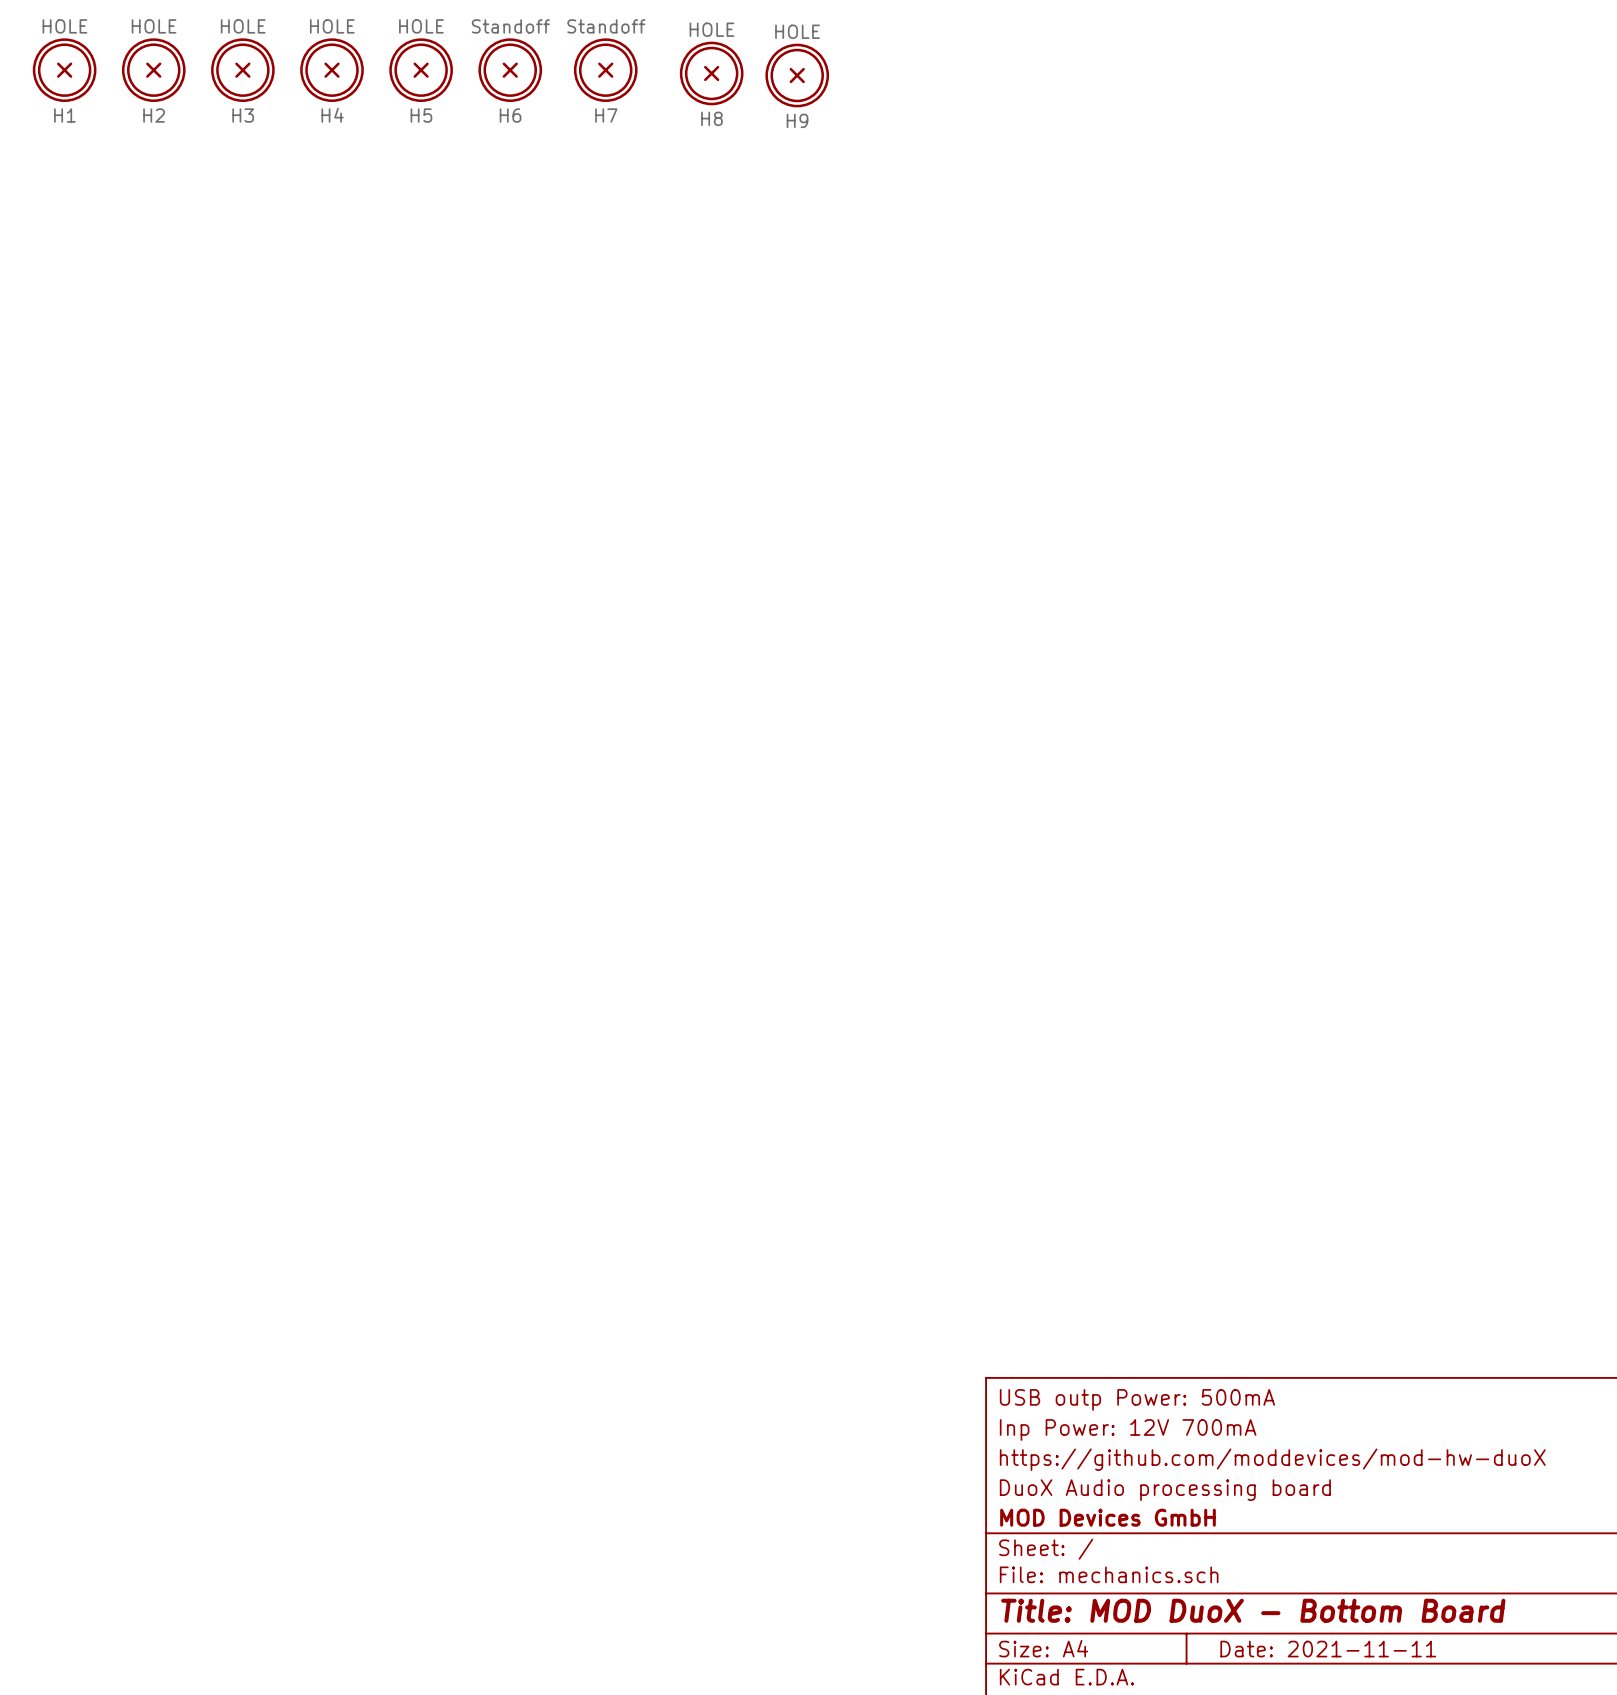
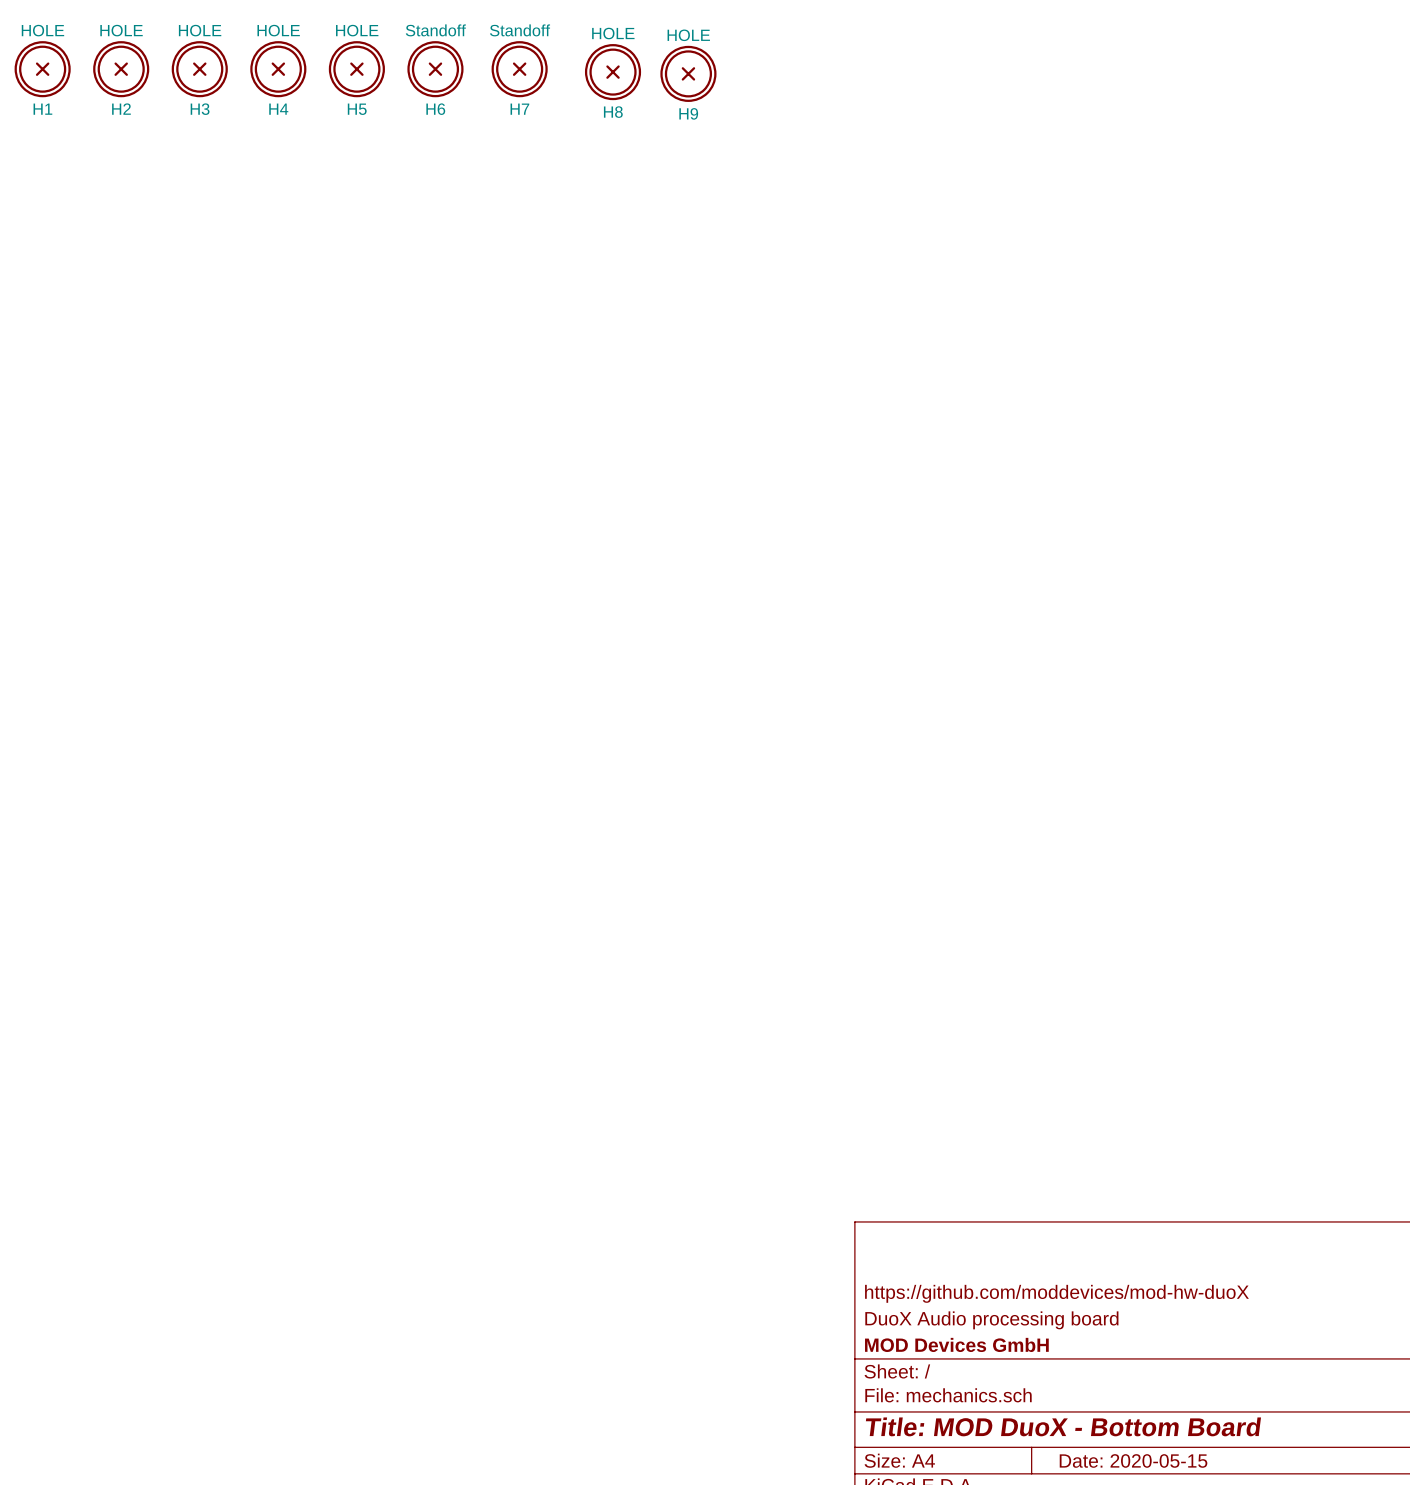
title block: USB outp Power: 500mA (1137, 1399) -> none
title block: Inp Power: 12V 700mA (1128, 1429) -> none
title block: Date: 2021-11-11 (1328, 1649) -> Date: 2020-05-15 (1133, 1460)

